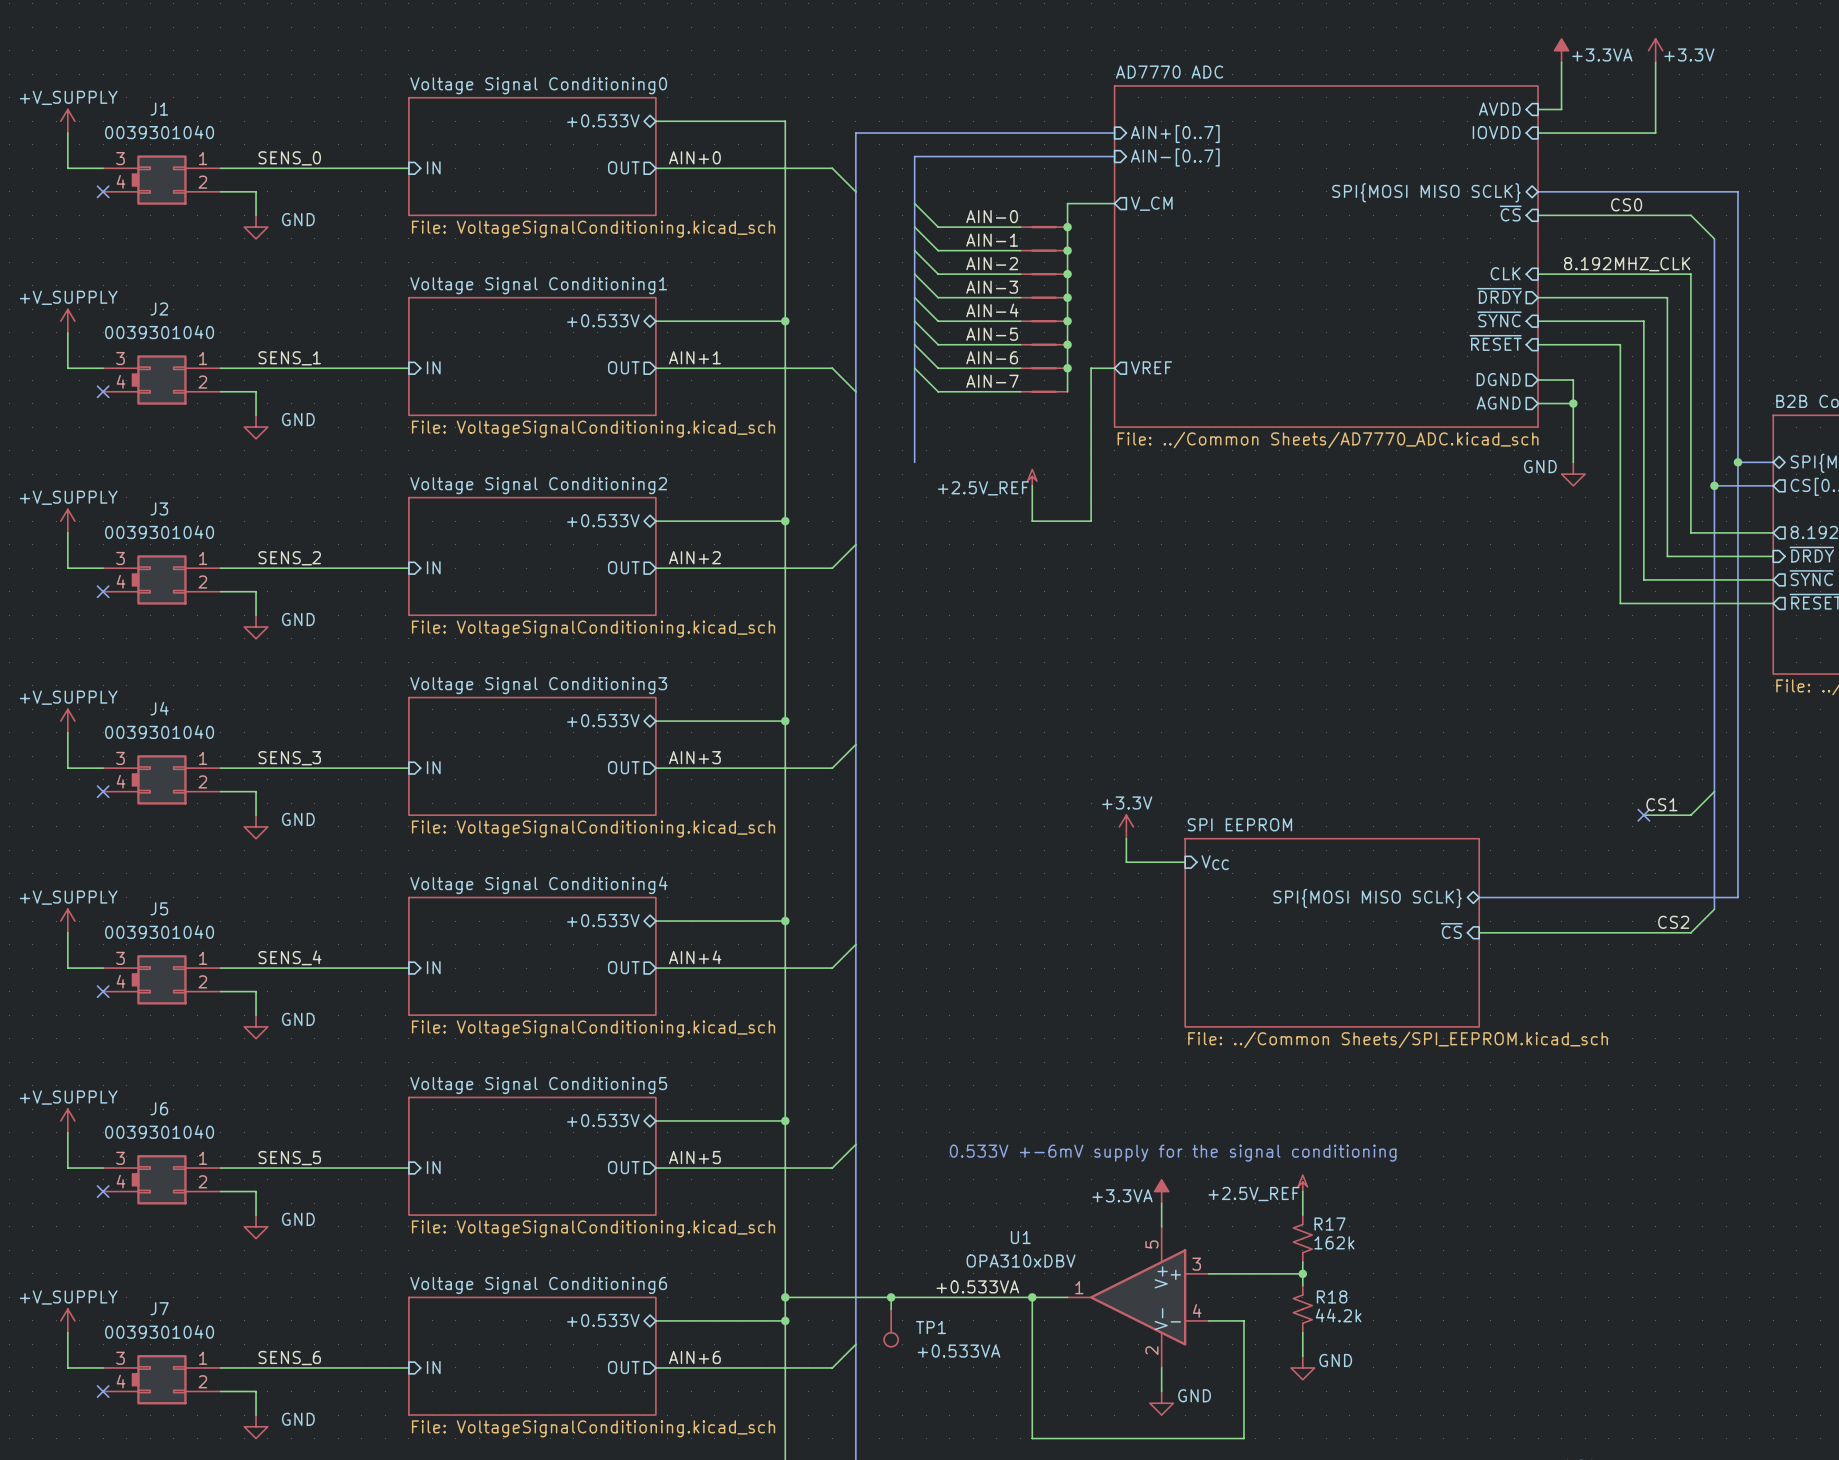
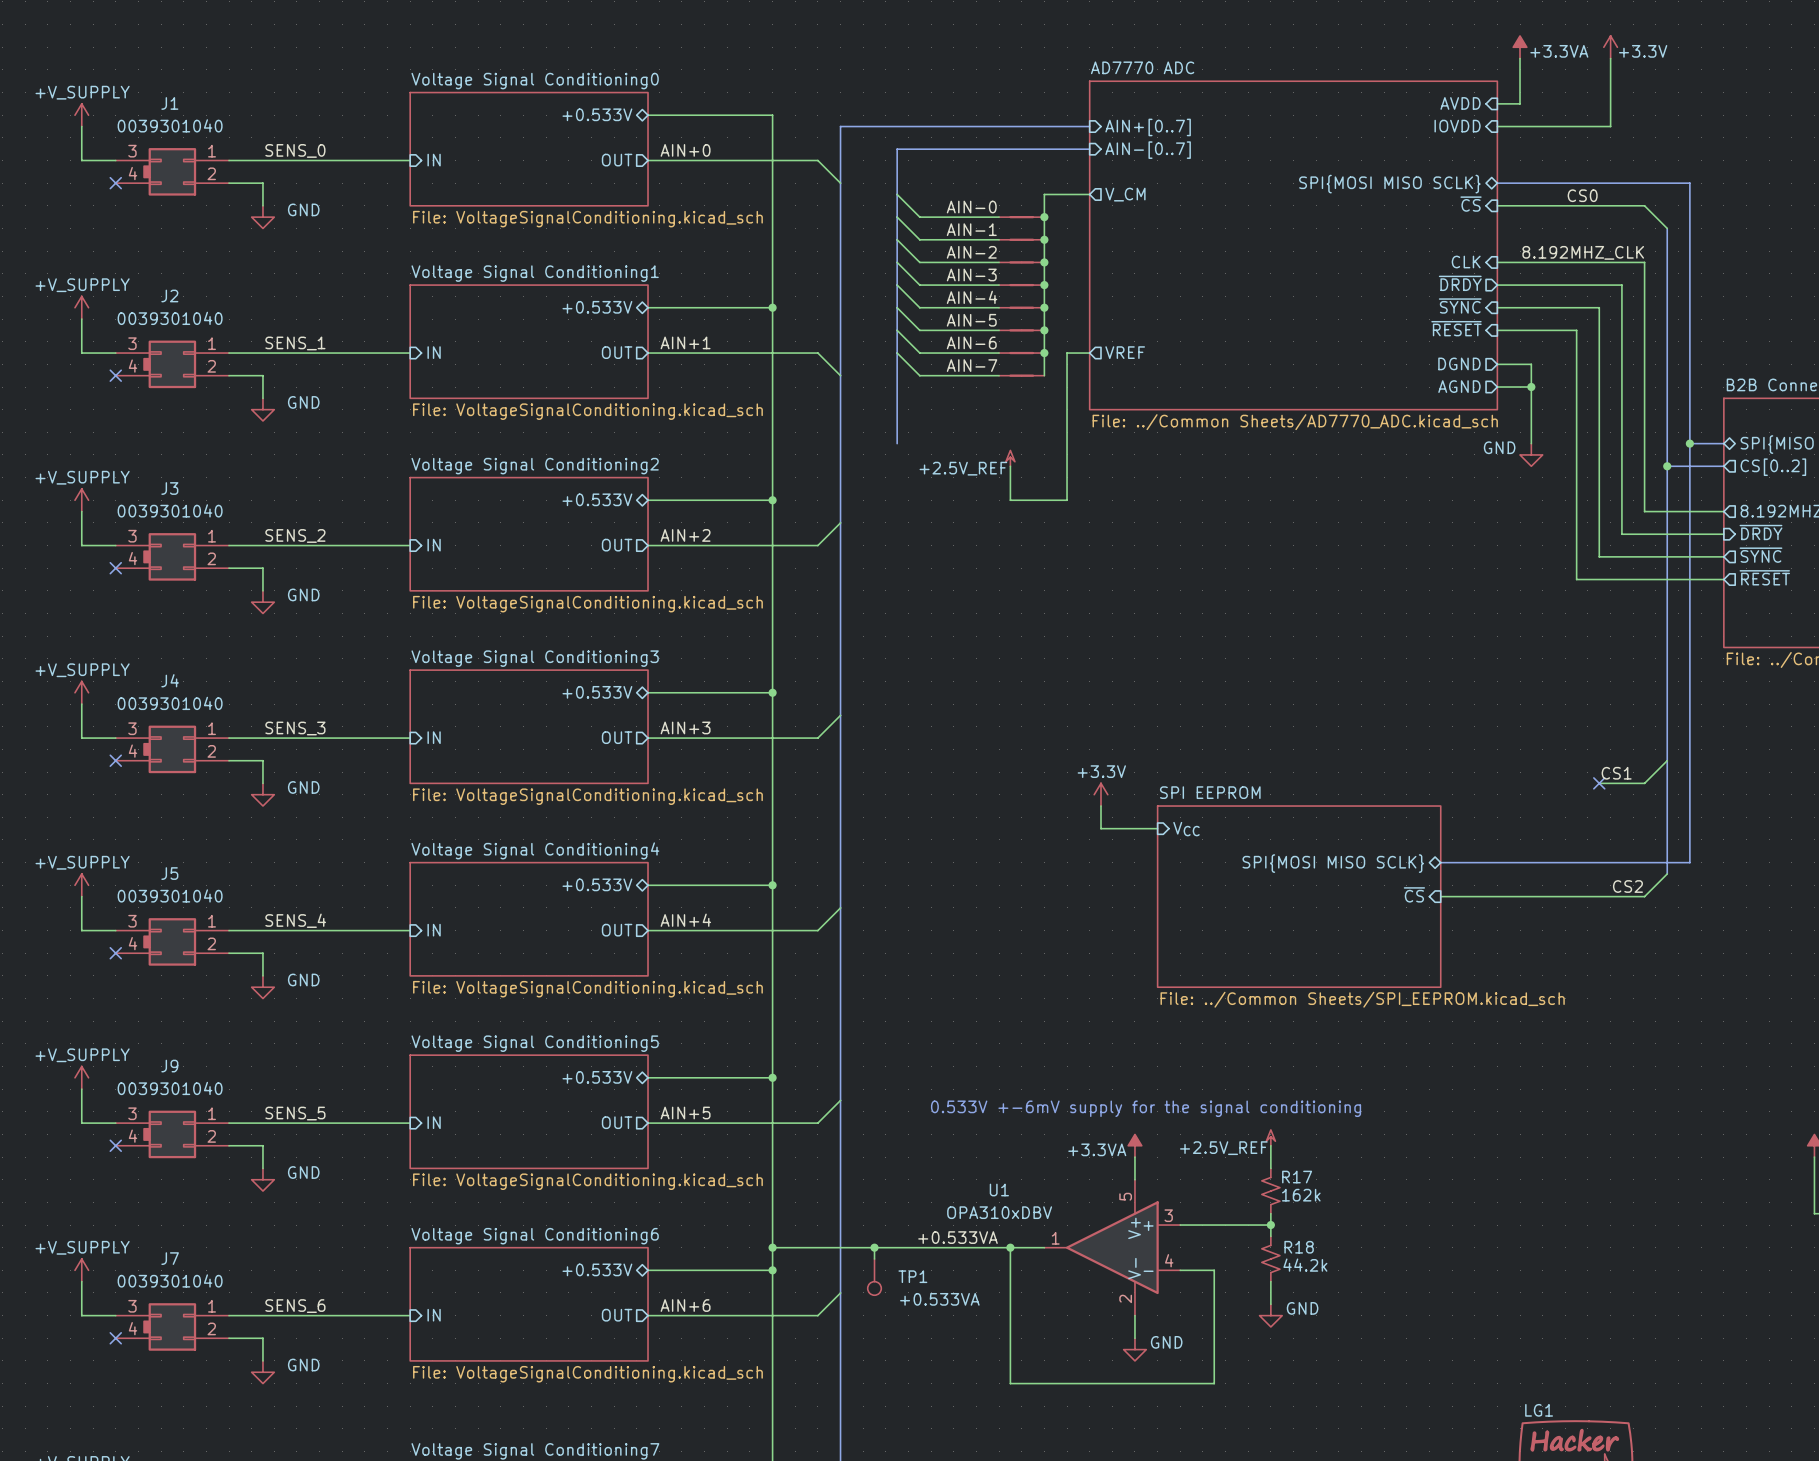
J6 name: J6 (159, 1108) -> J9 (169, 1066)

